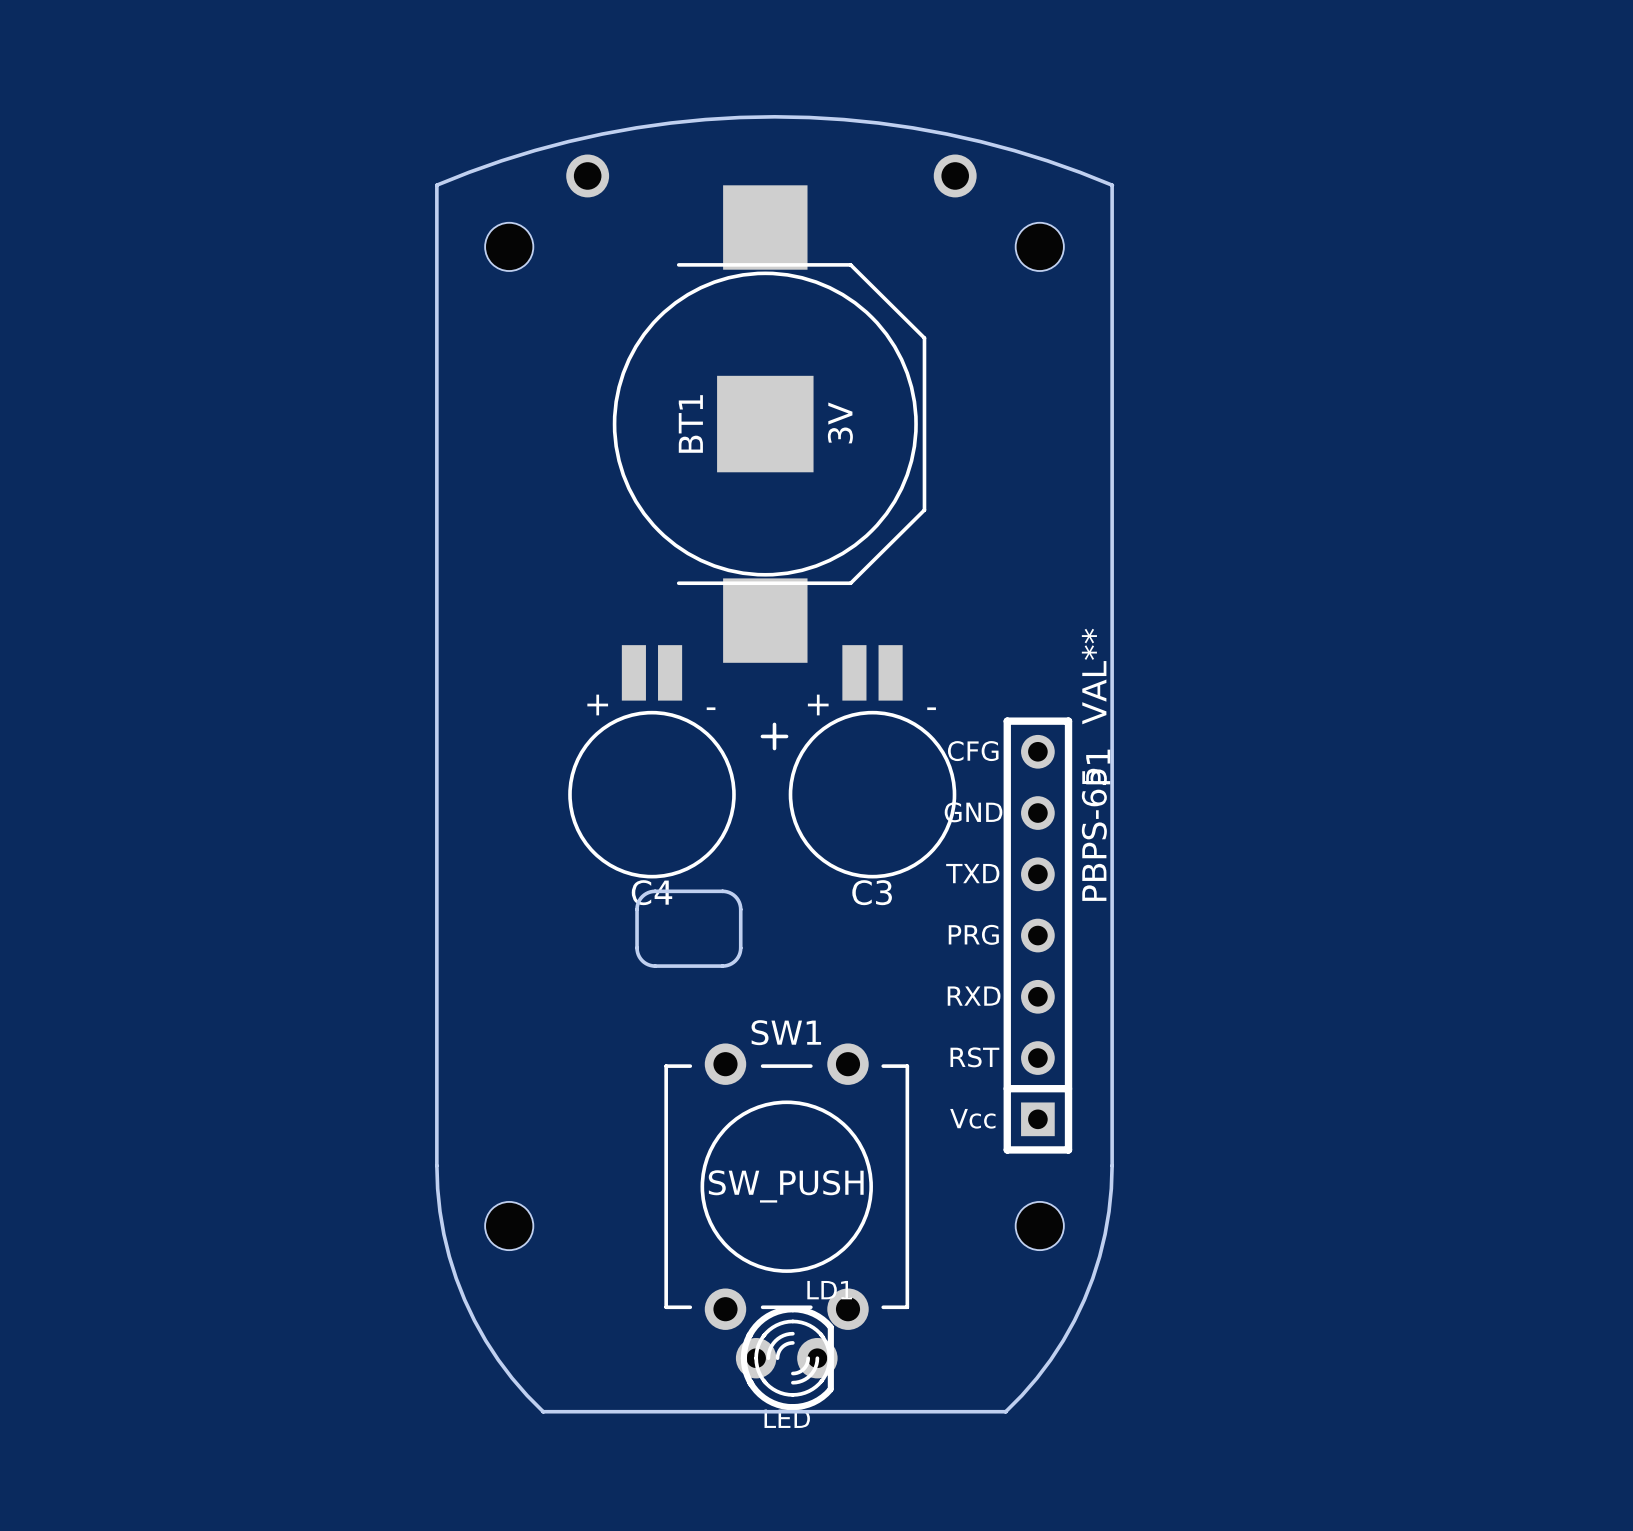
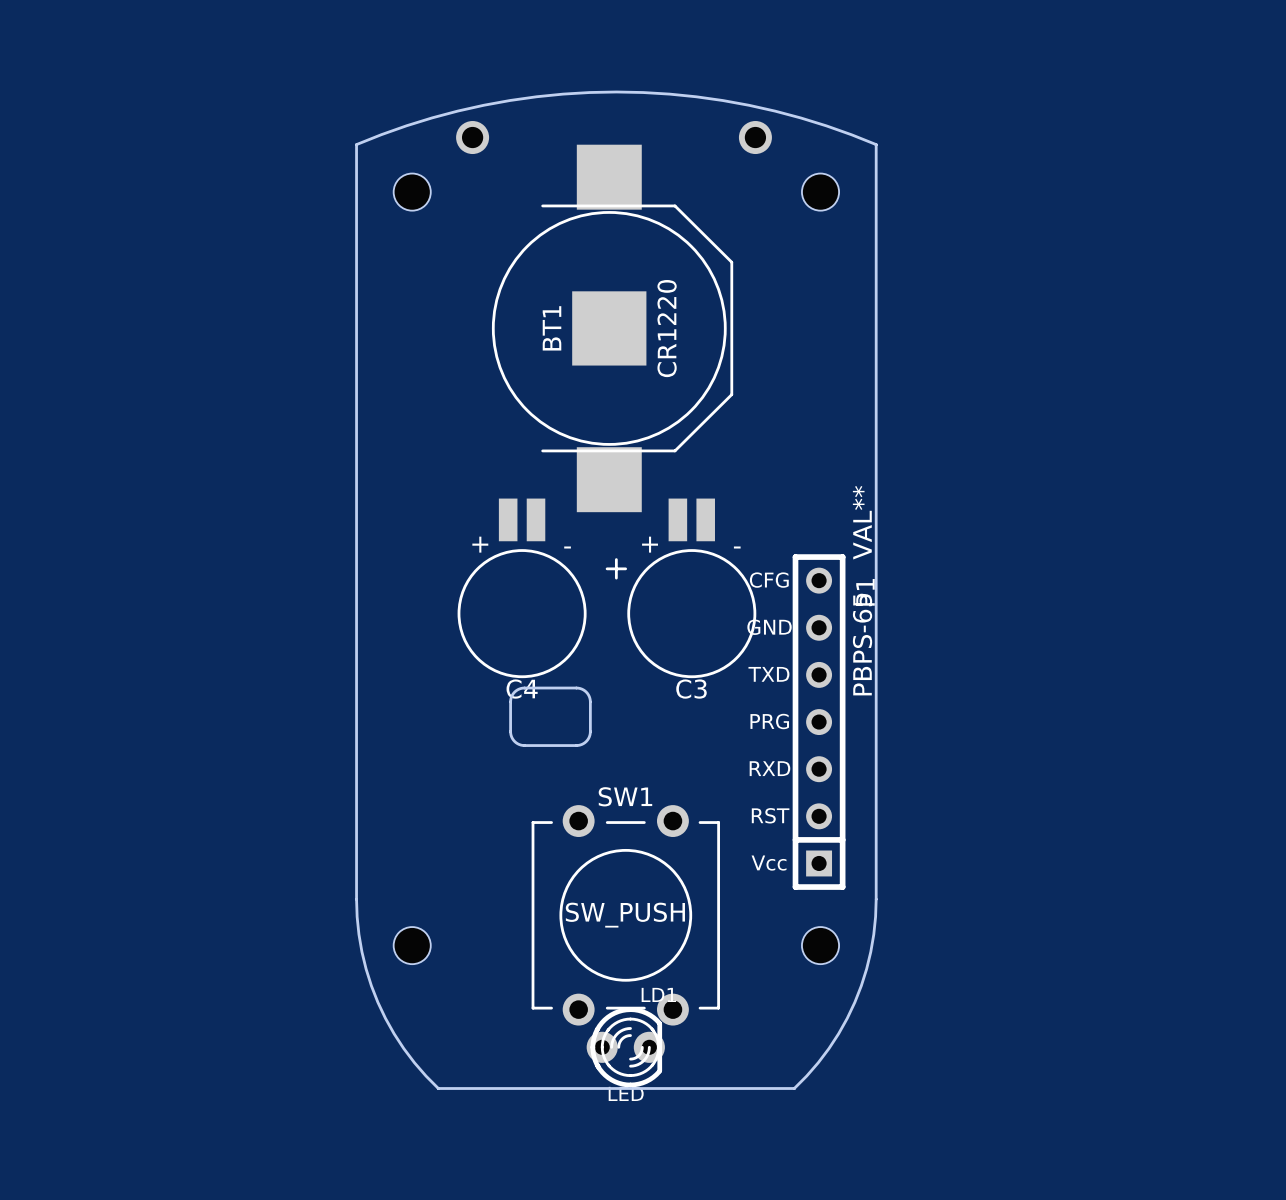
BT1 value: 3V (840, 422) -> CR1220 (667, 328)

